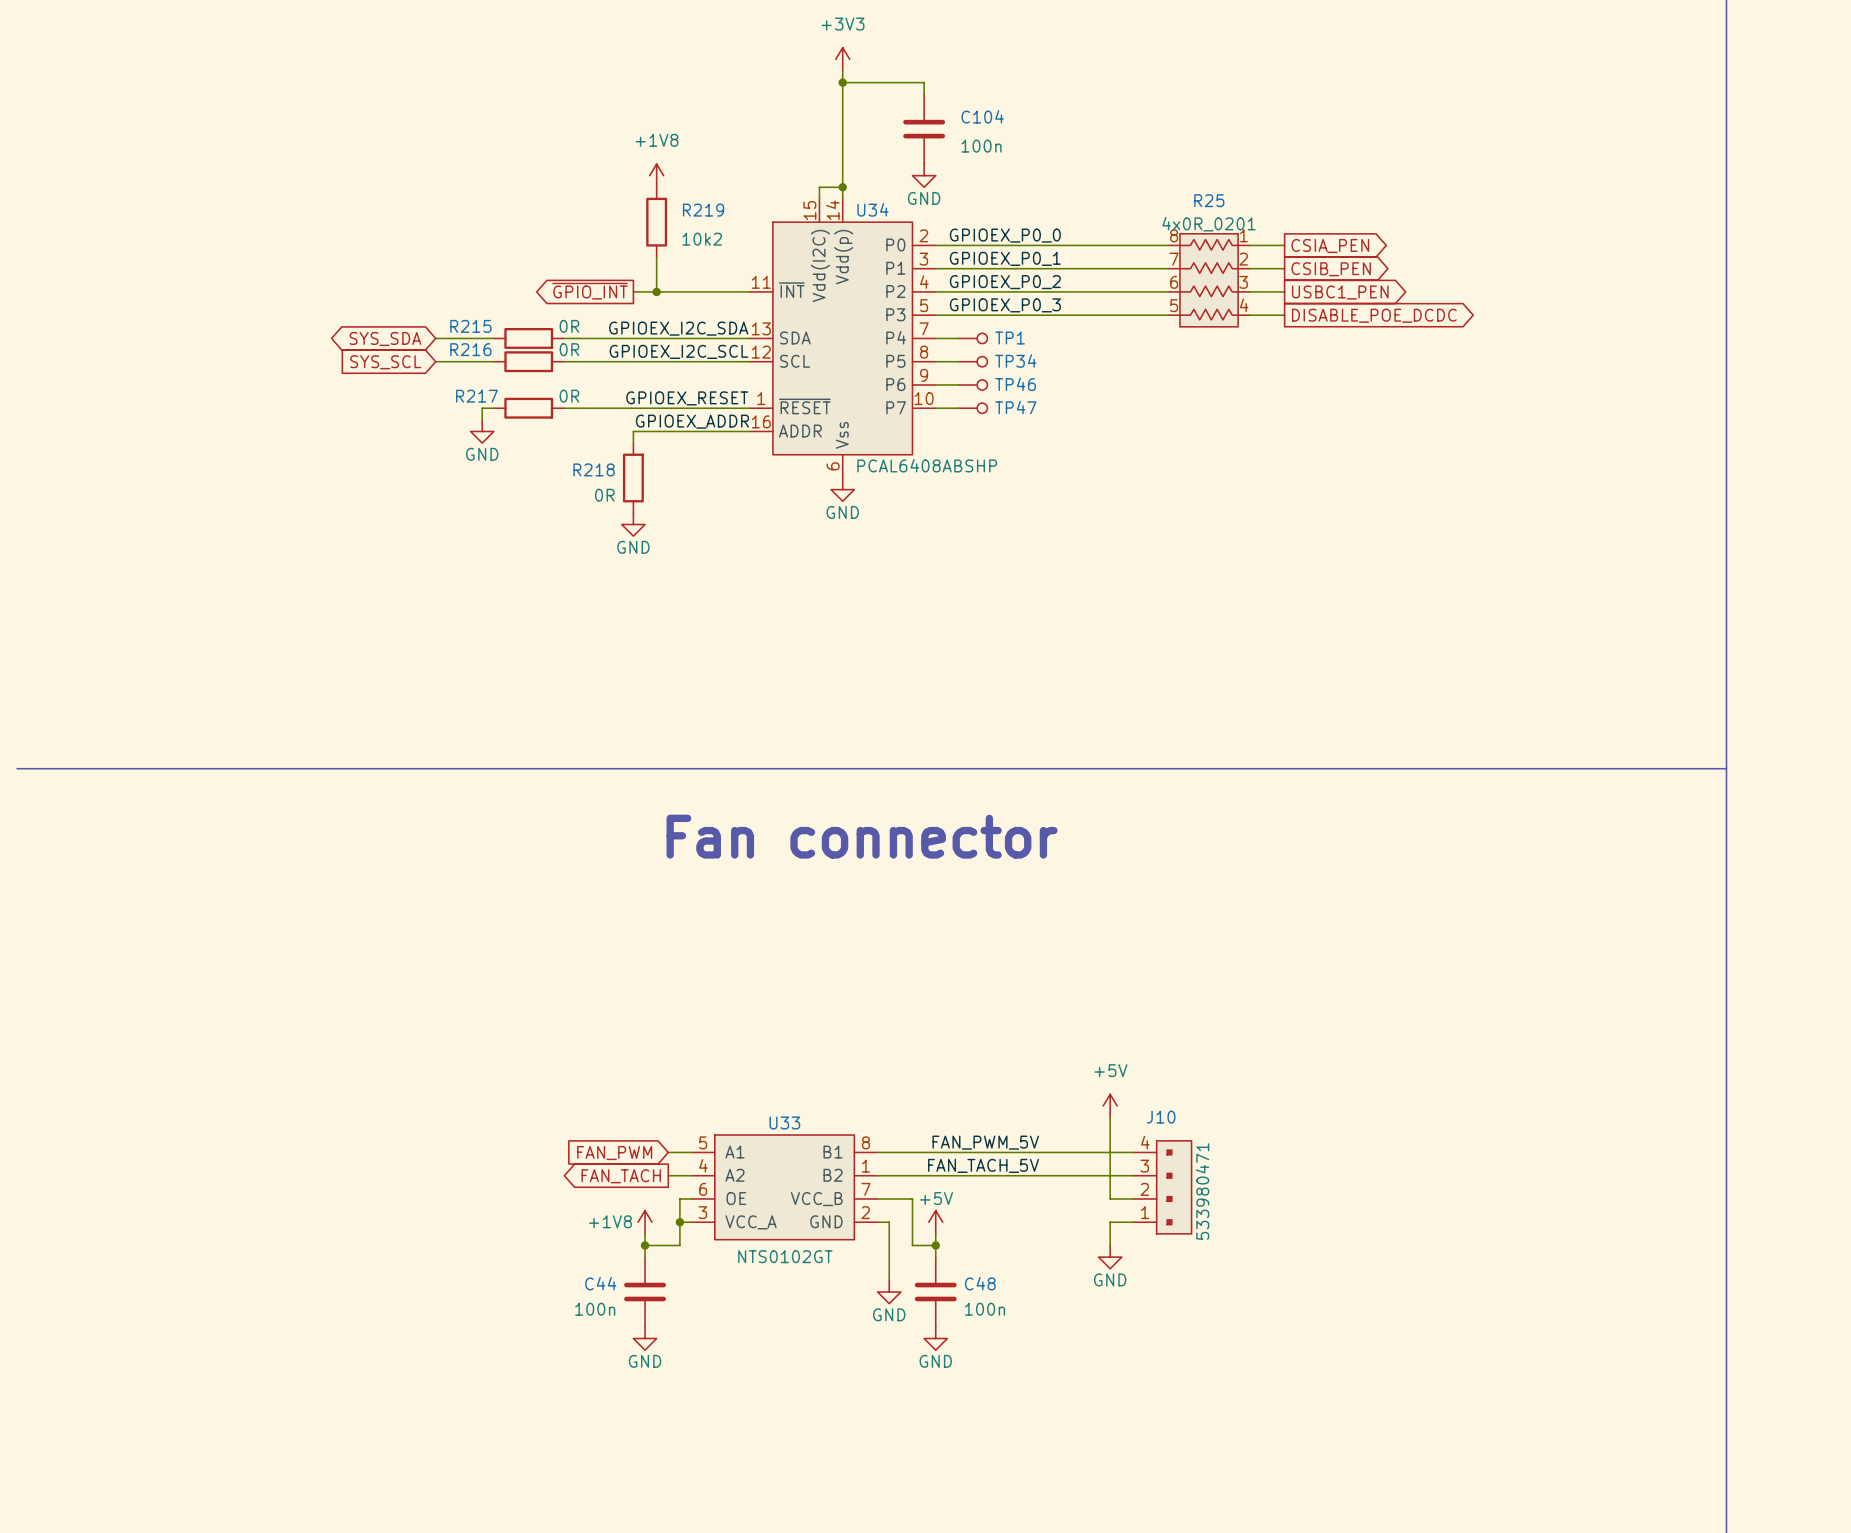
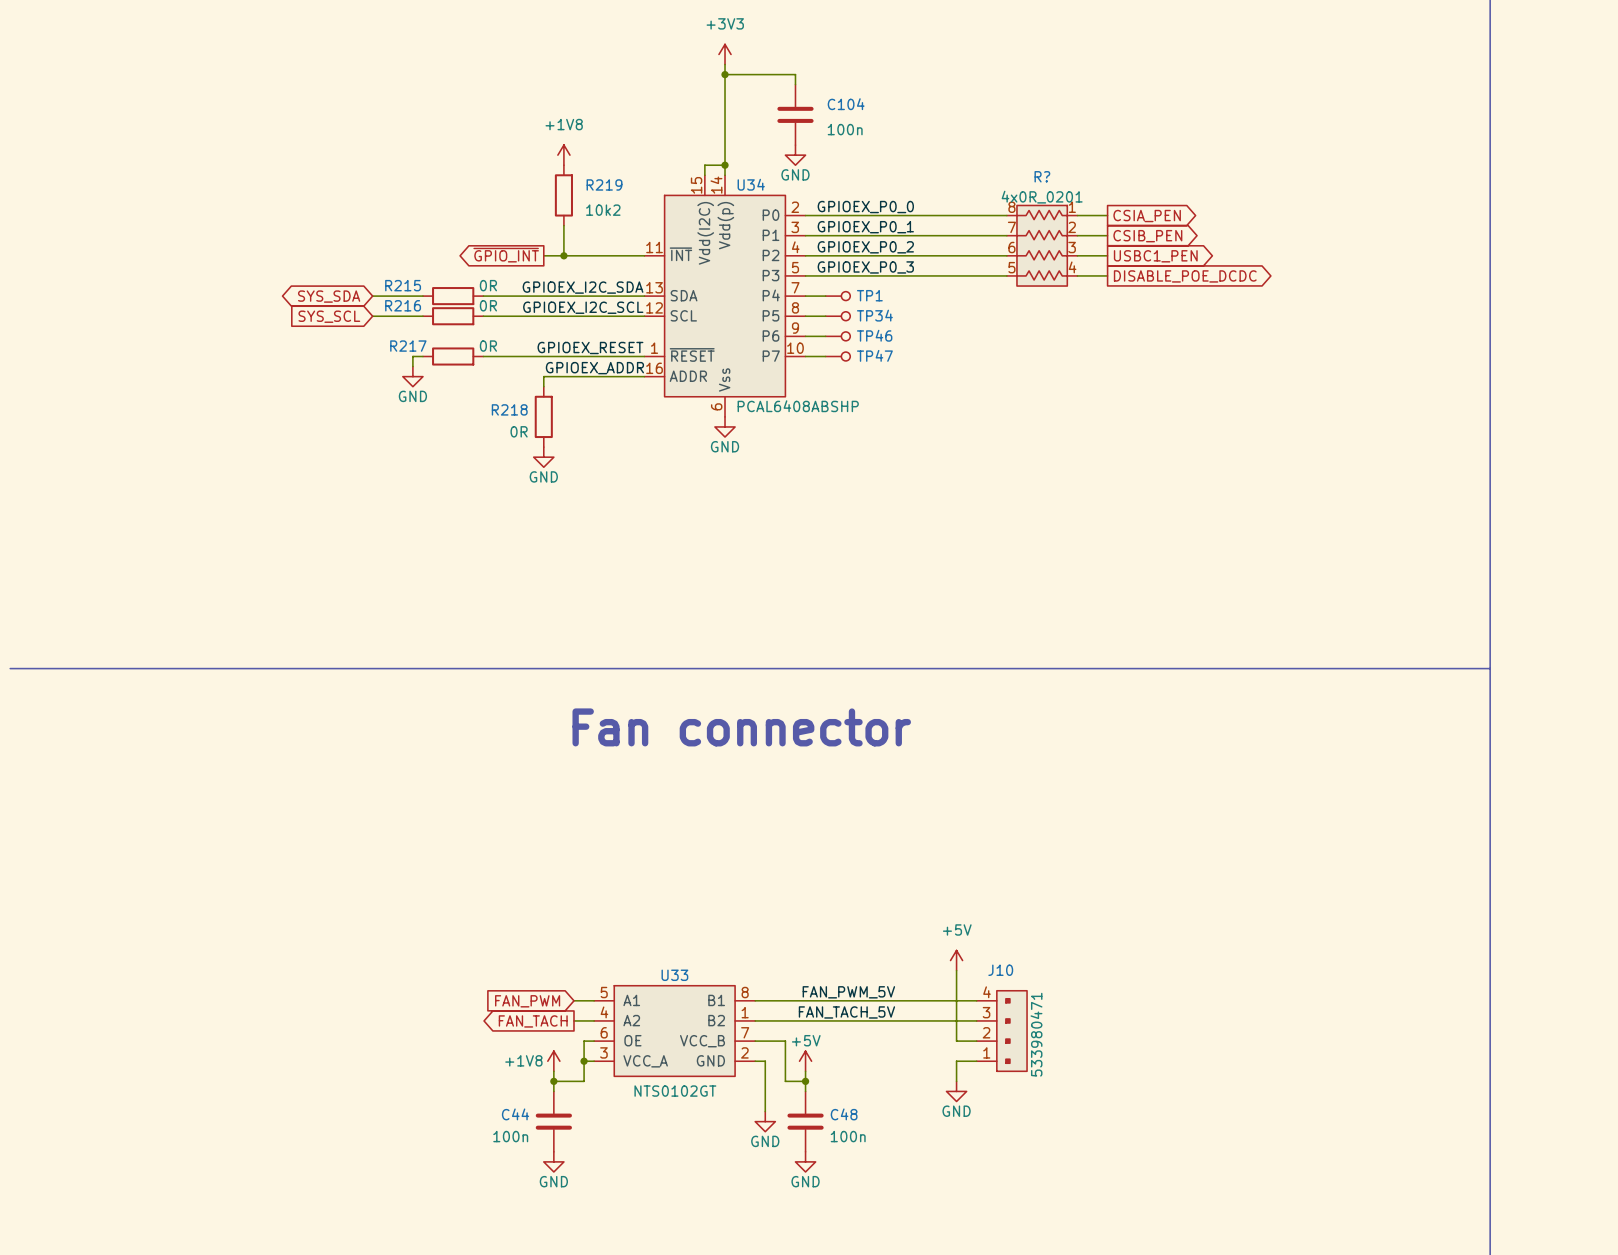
R25 name: R25 (1209, 200) -> R? (1042, 176)

